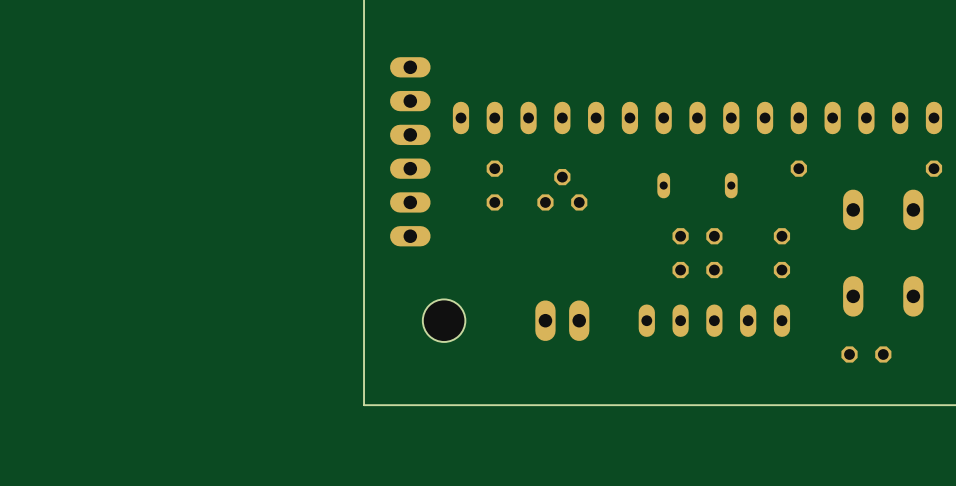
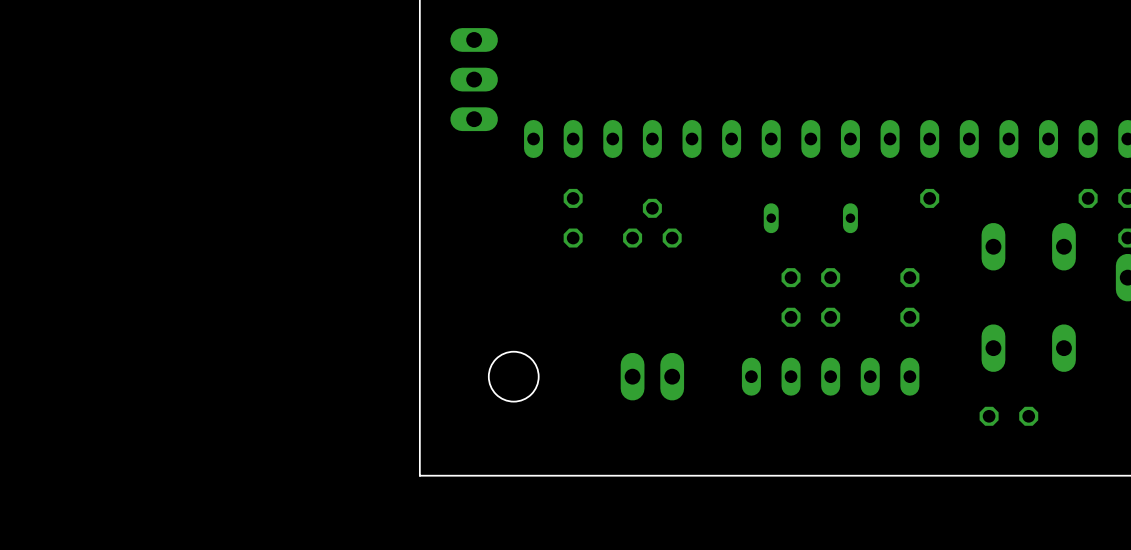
part position: (410, 101) -> (474, 79)
part: (410, 202) -> none

